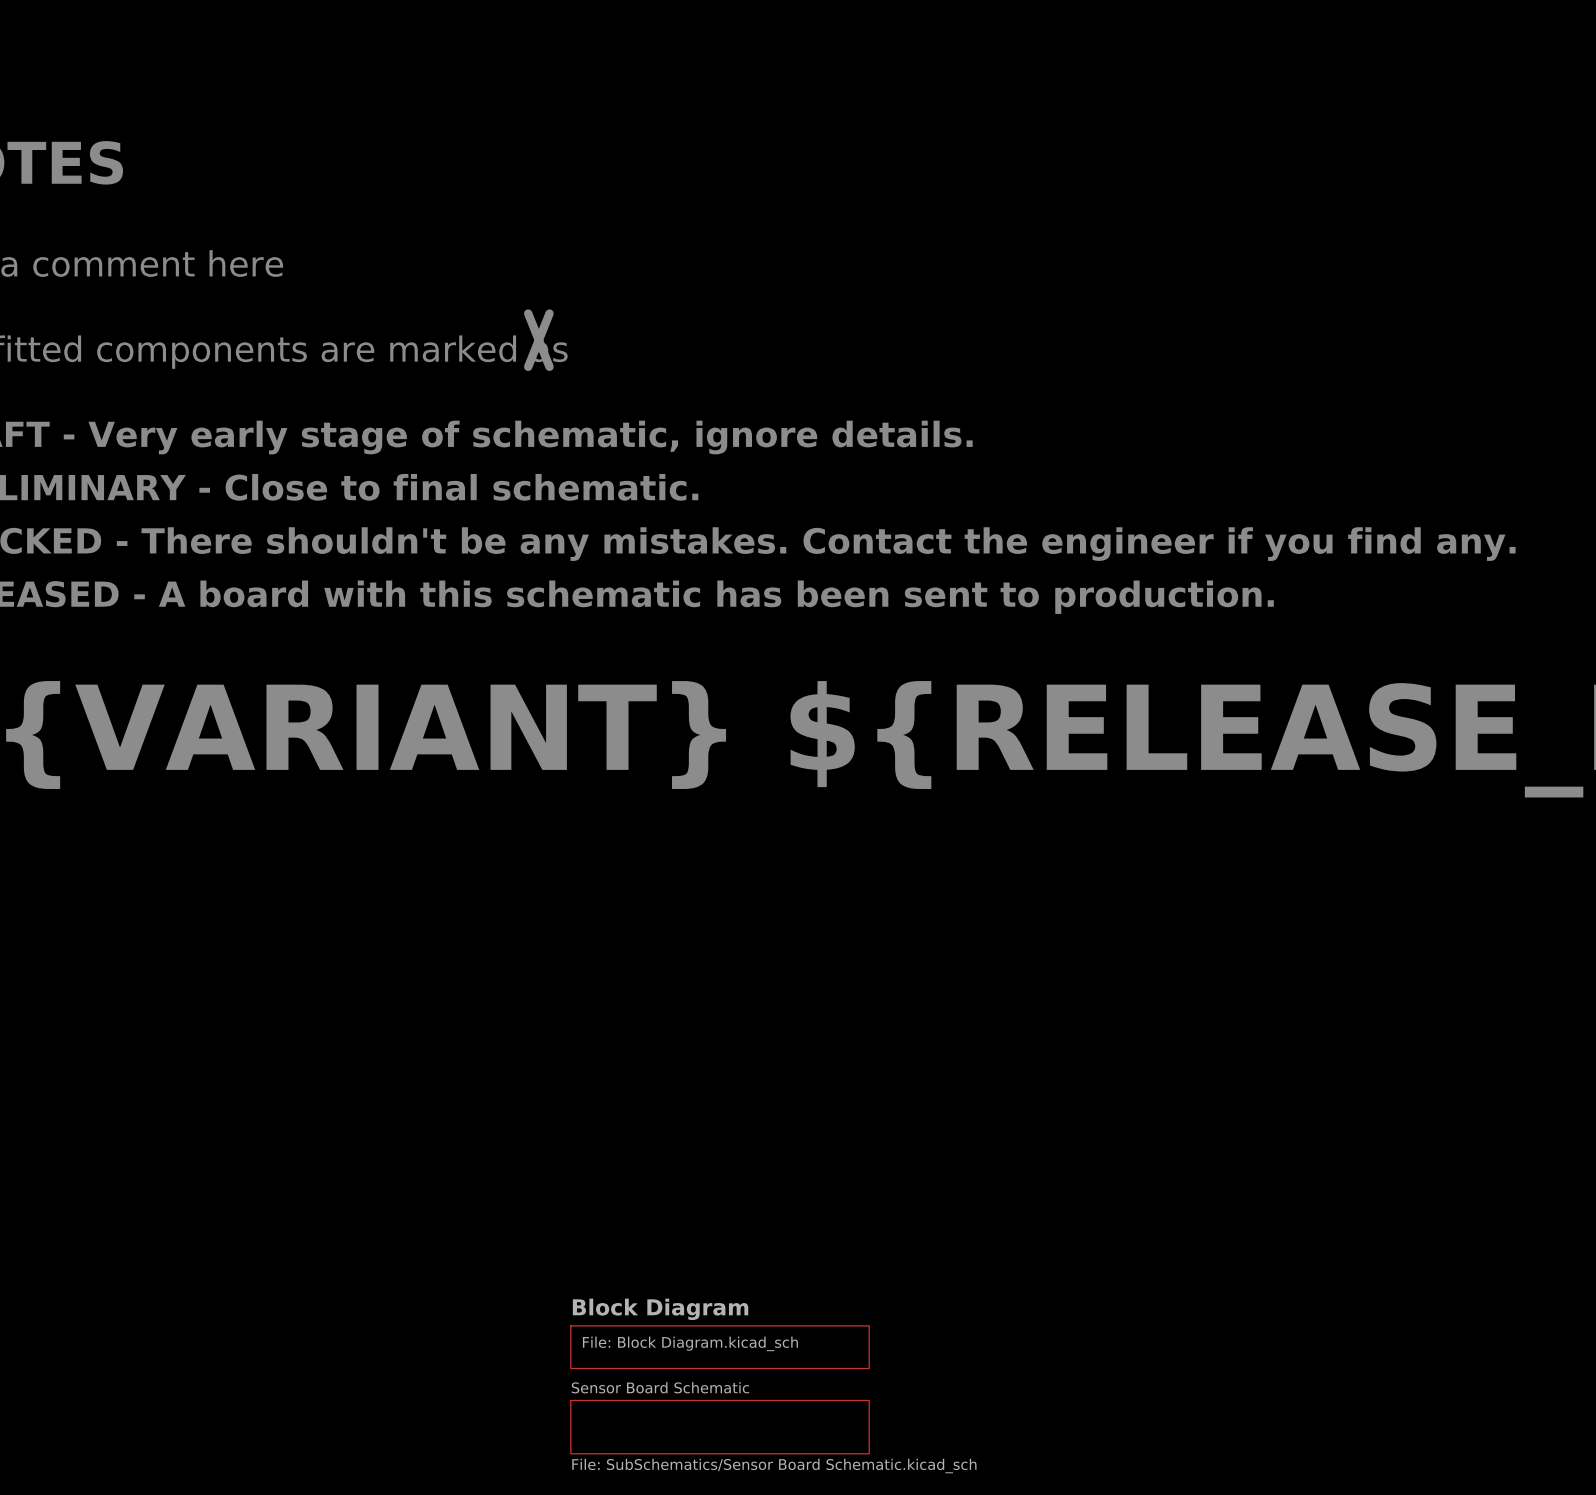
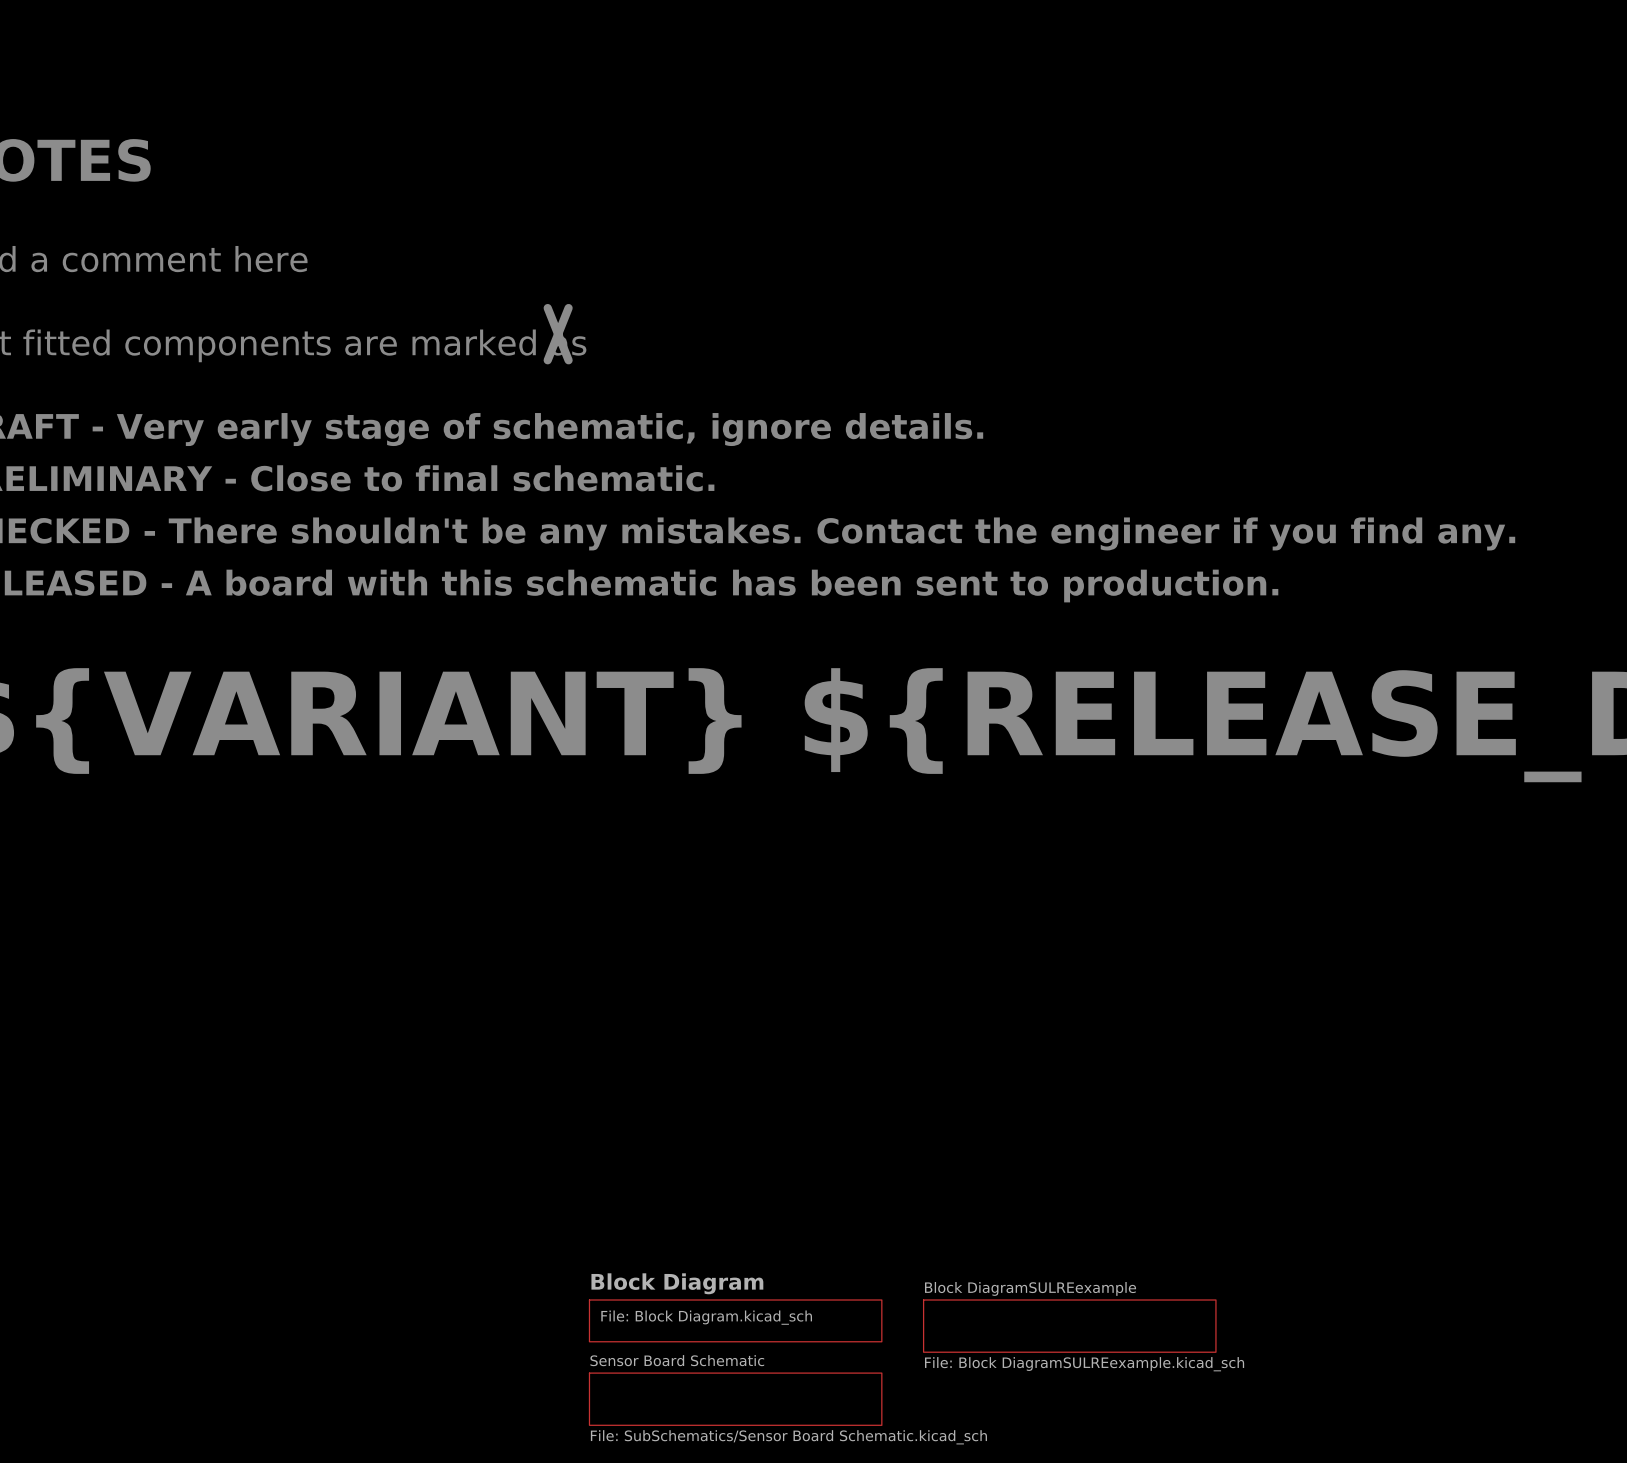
sheet Block DiagramSULREexample: none -> File: Block DiagramSULREexample.kicad_sch (1069, 1326)

